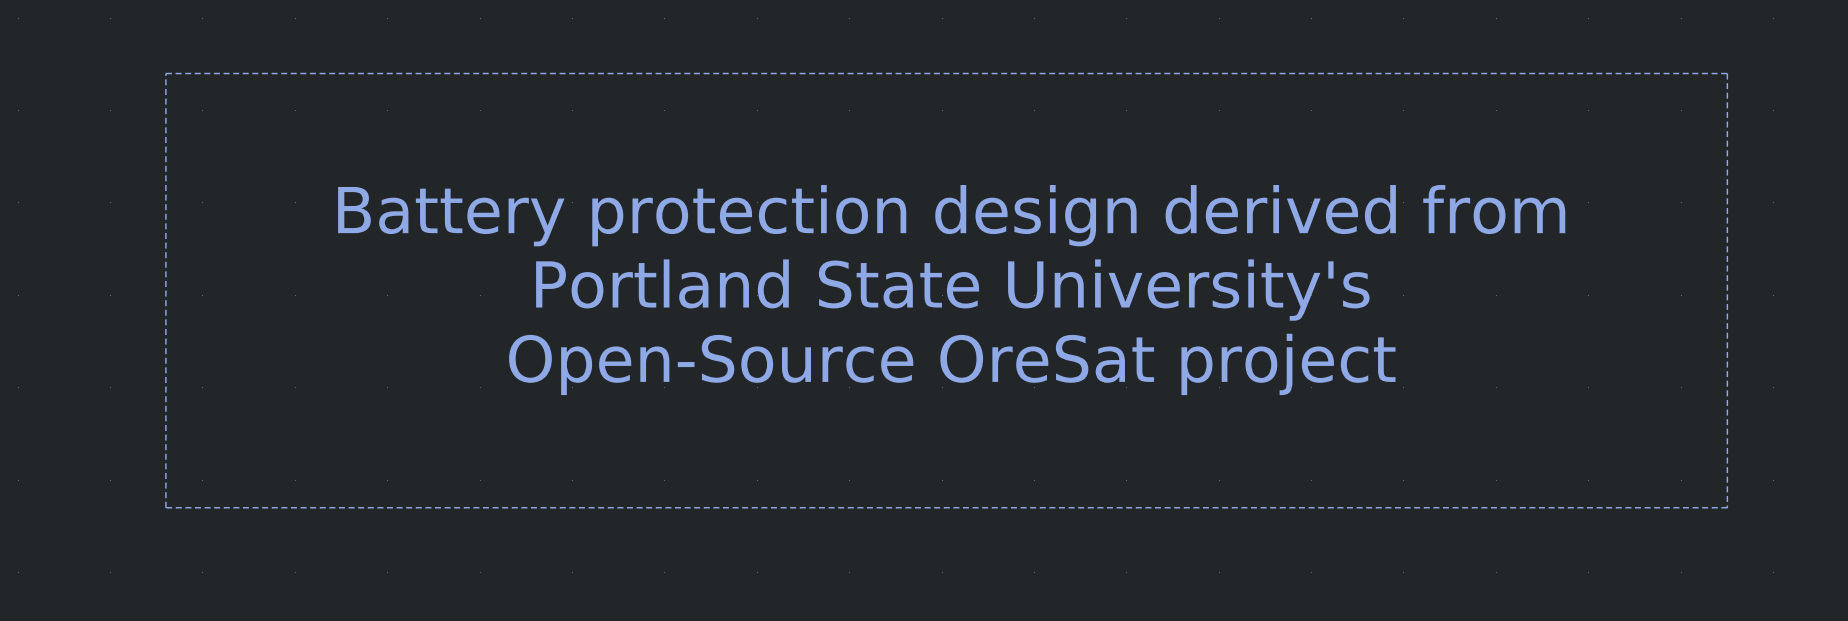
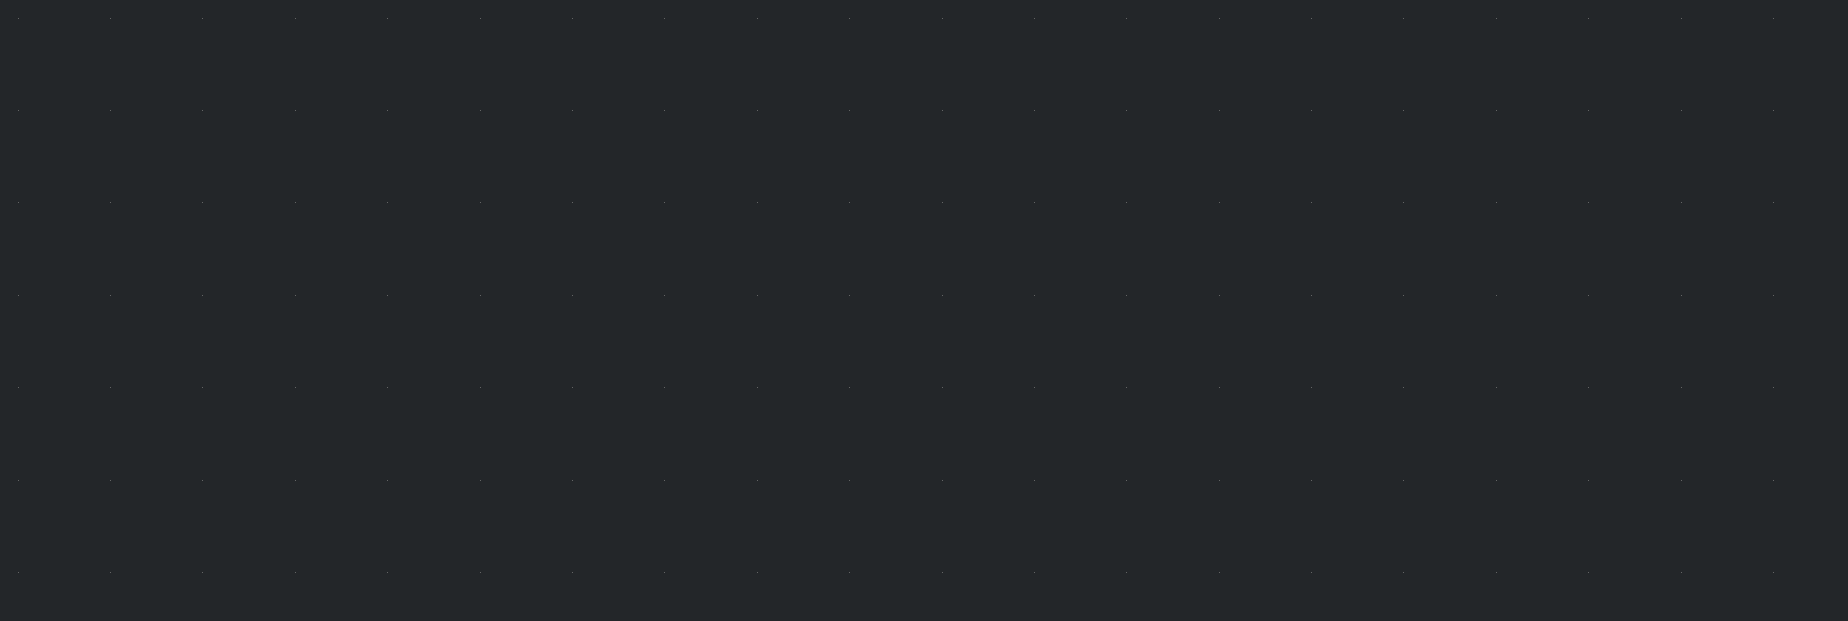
line: (165, 73) (1727, 73) (1727, 507) (165, 507) (165, 73) -> none
text: Battery protection design derived from (951, 215) -> none
text: Portland State University's (952, 290) -> none
text: Open-Source OreSat project (952, 364) -> none

